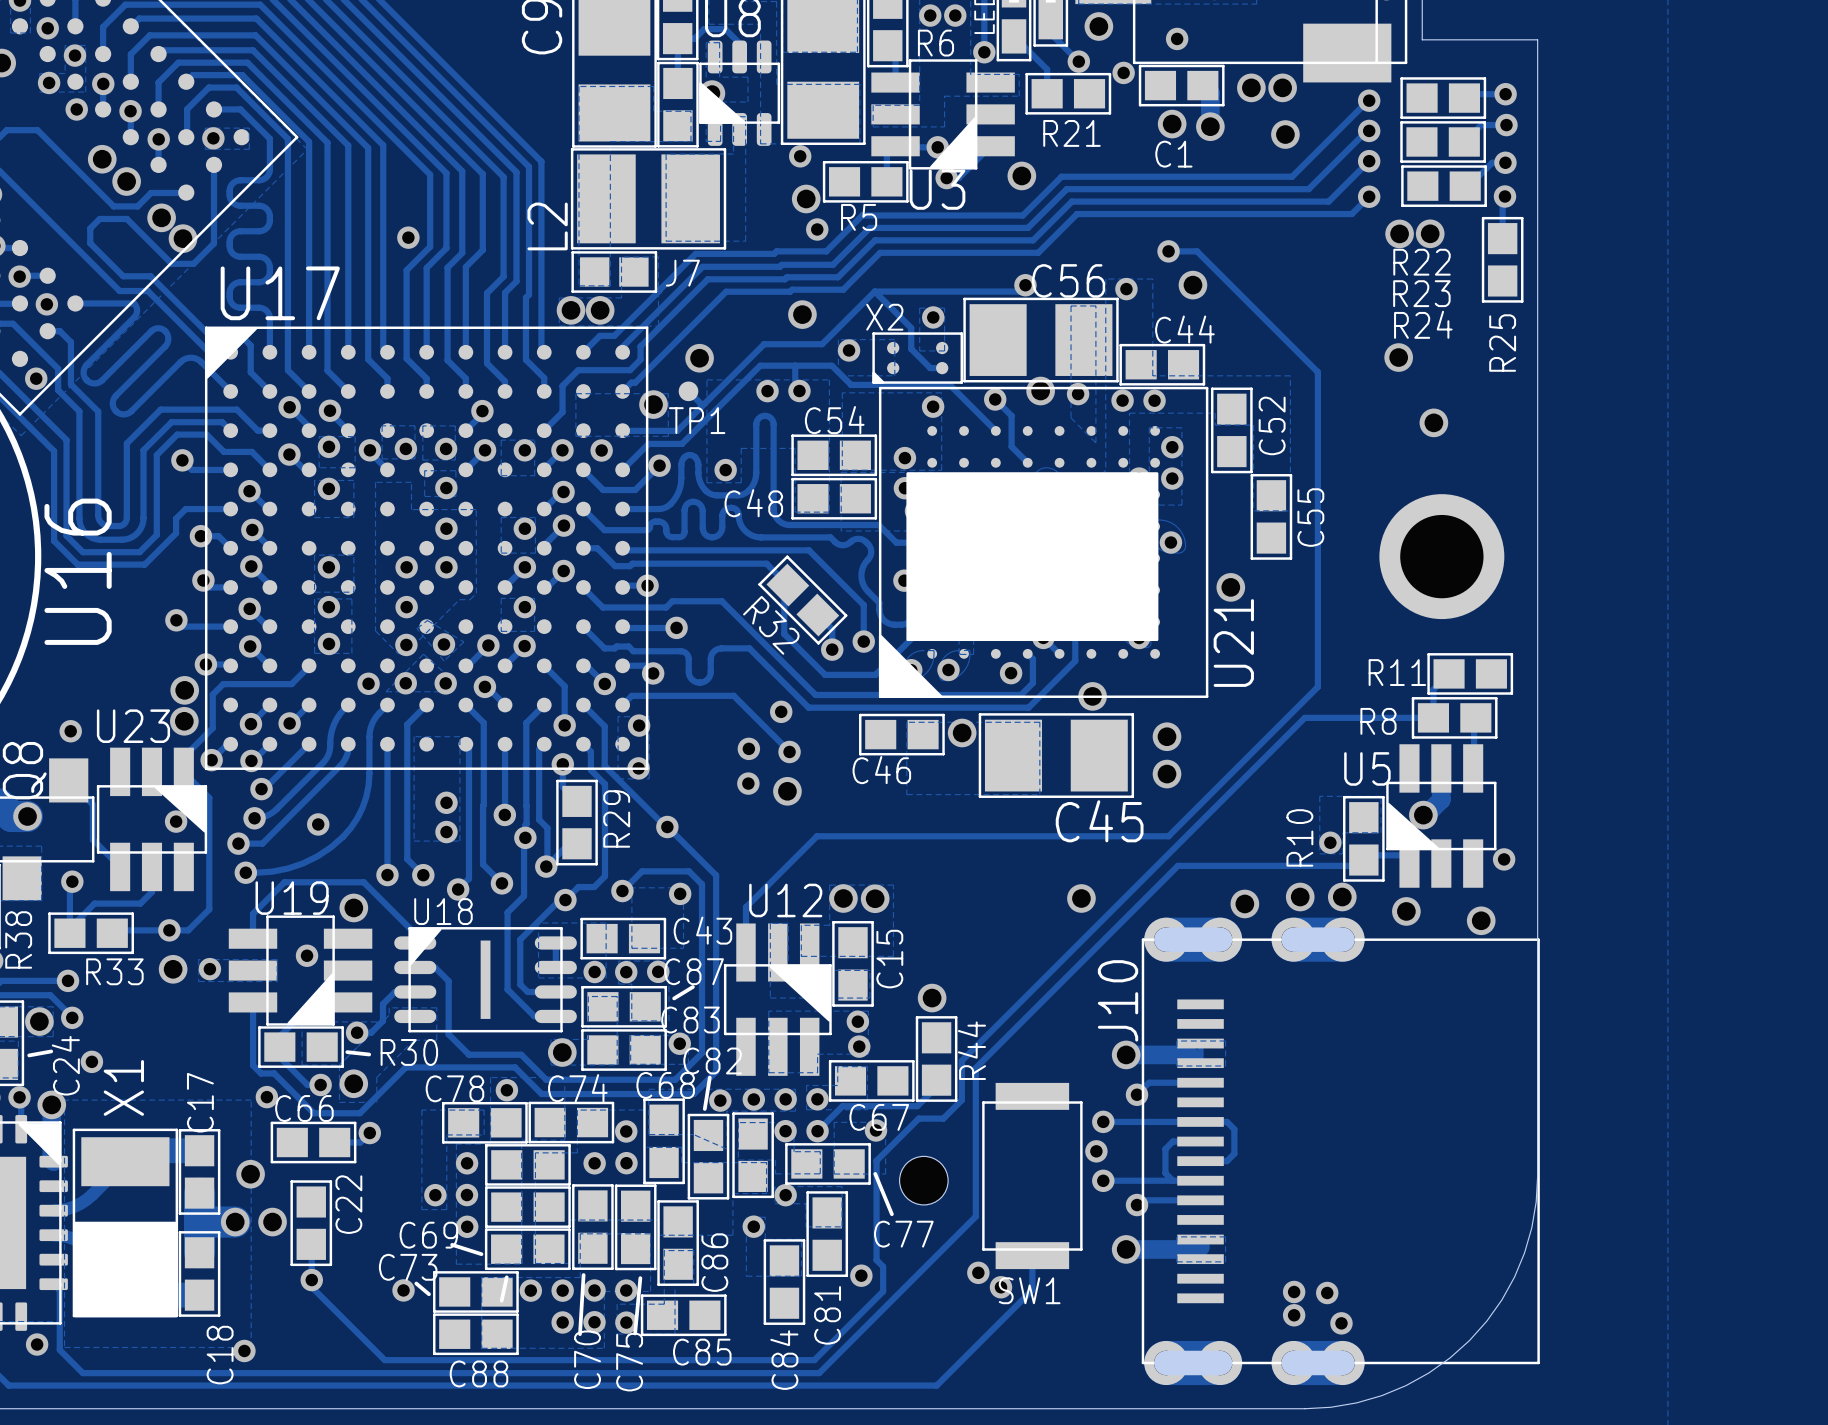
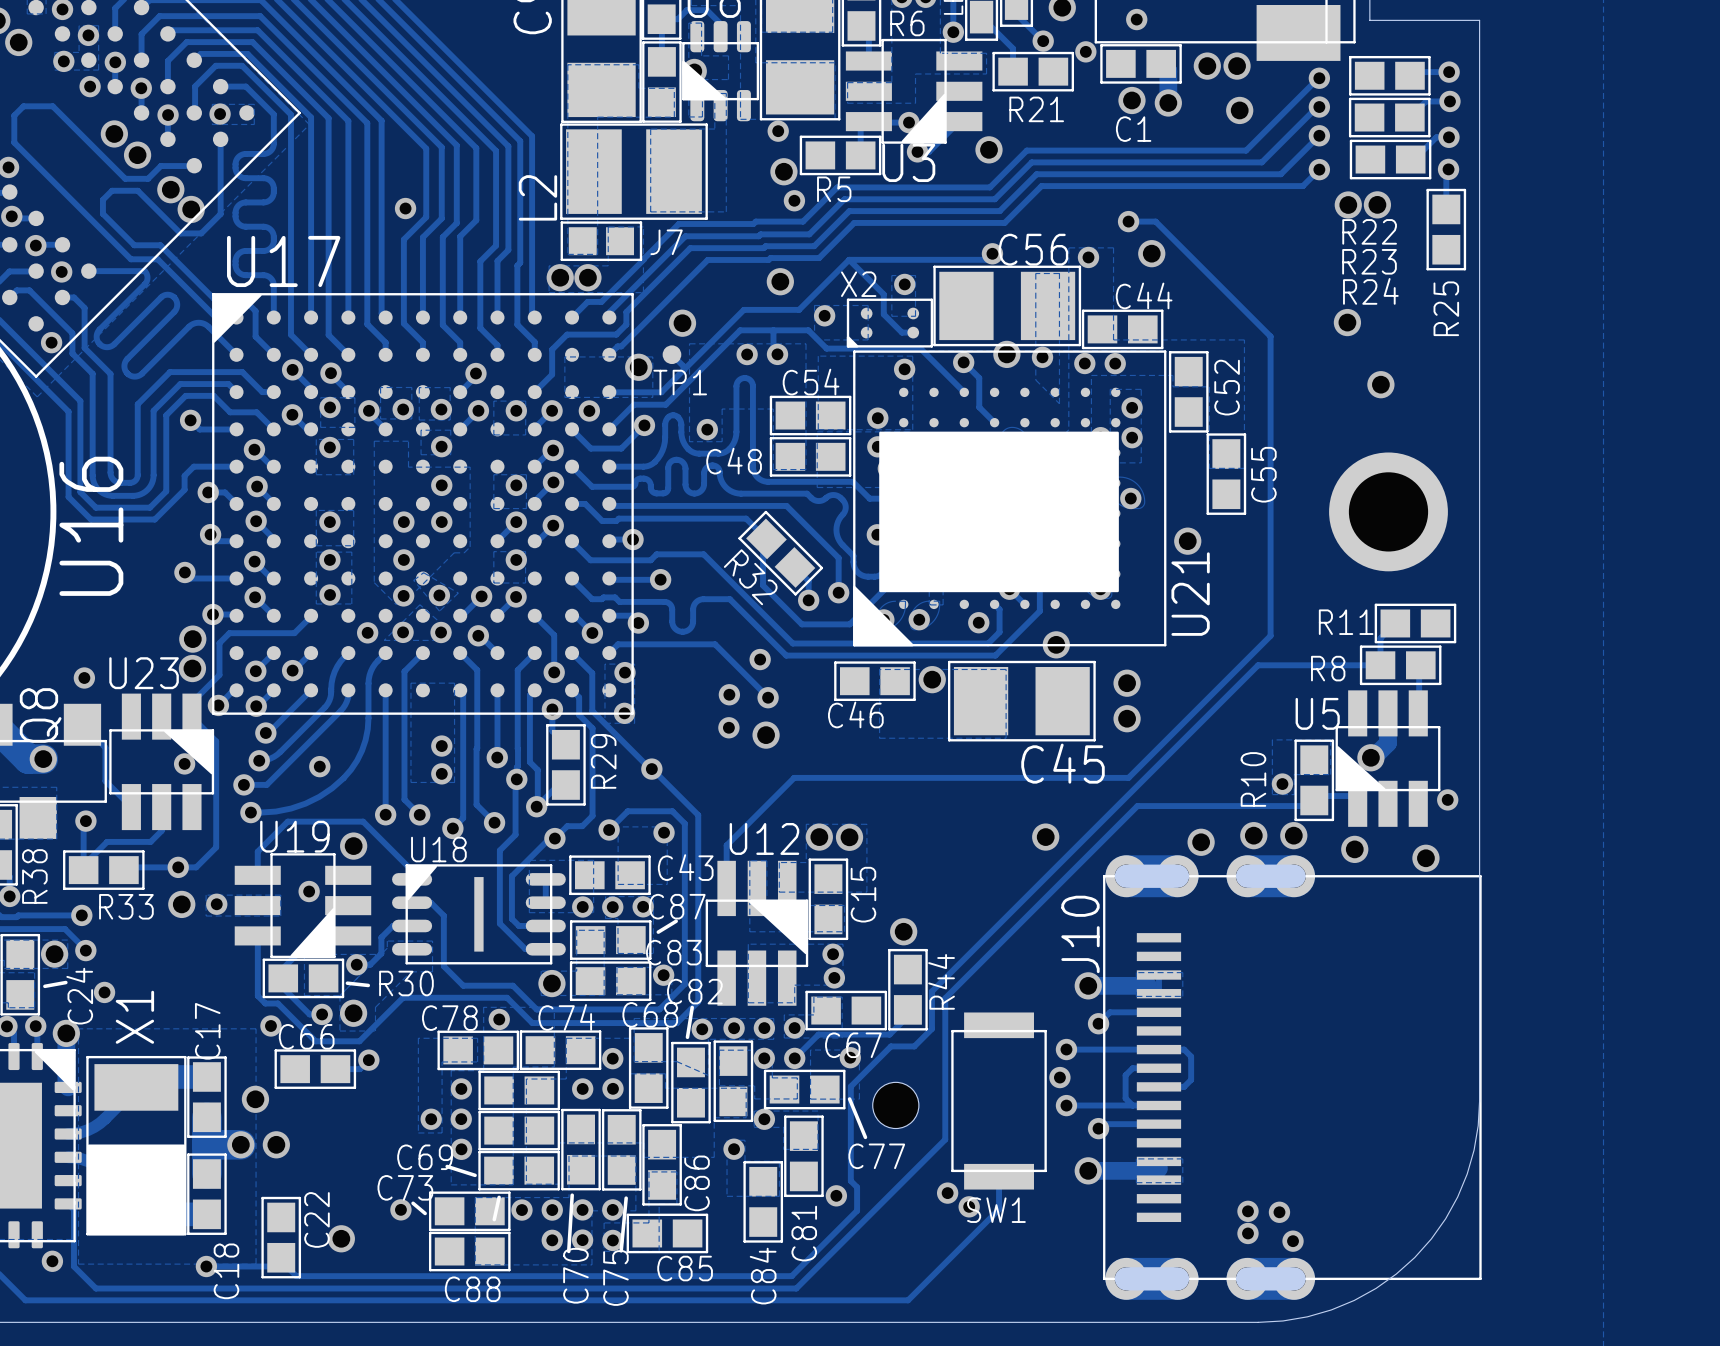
C22 position: (311, 1223) -> (281, 1237)
track: (311, 1244) (311, 1287) (384, 1360) -> (281, 1260) (296, 1276) (383, 1276)
via: (311, 1280) -> none
via: none -> (341, 1238)
track: none -> (281, 1260) (275, 1266) (206, 1266)
via position: (244, 1350) -> (206, 1266)

